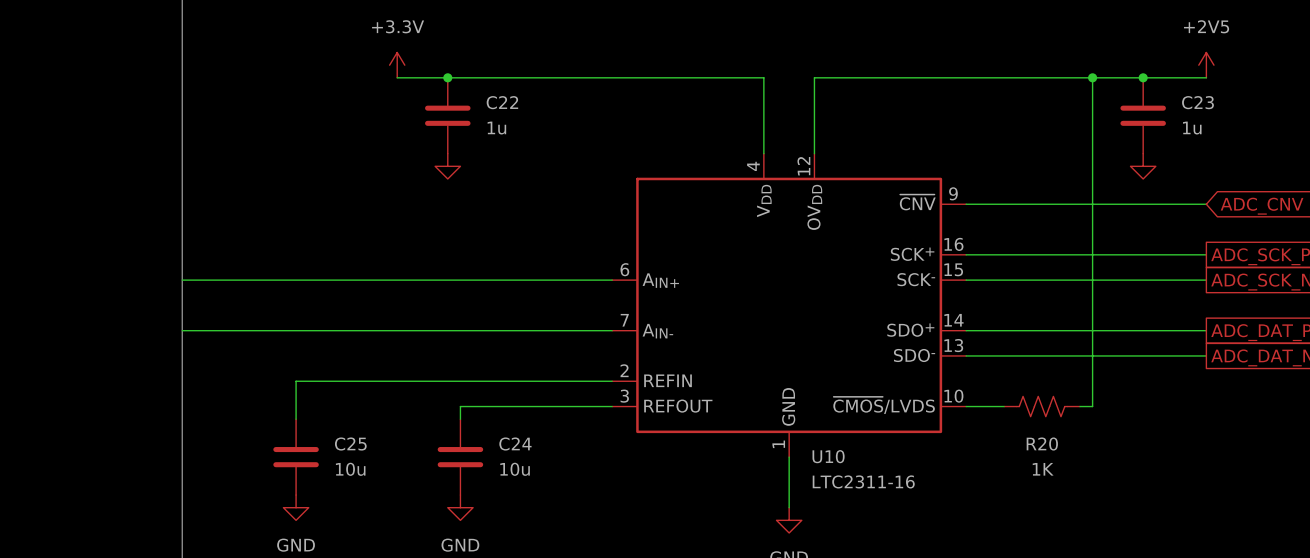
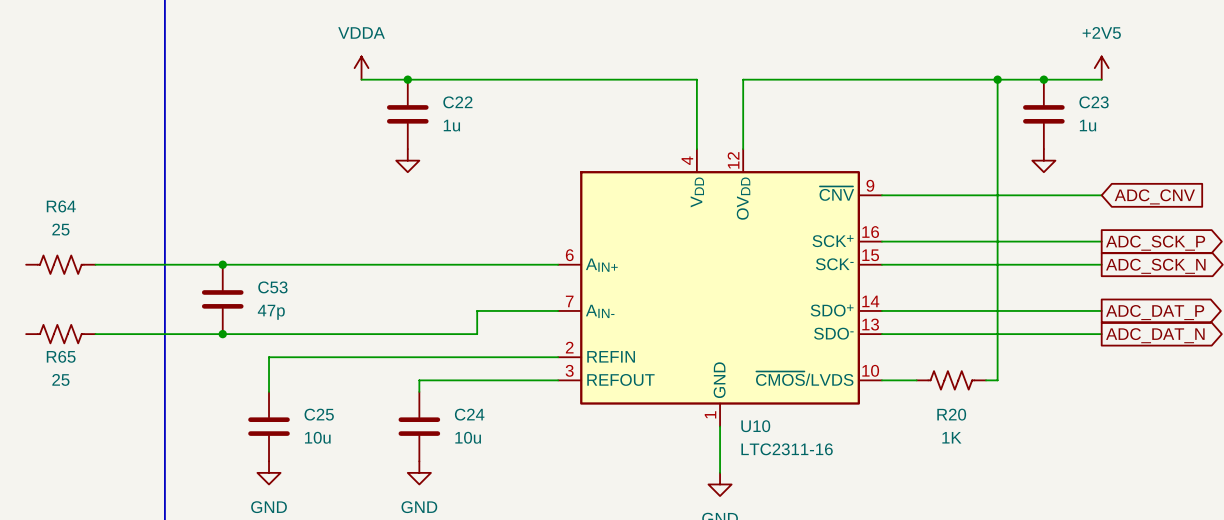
power symbol: +3.3V (397, 65) -> VDDA (361, 68)
R64: none -> 25 (60, 264)
wire: none -> (95, 264) (164, 264)
junction: none -> (222, 264)
C53: none -> 47p (222, 299)
wire: (182, 330) (523, 330) -> (95, 334) (477, 334) (477, 310)
R65: none -> 25 (60, 334)
junction: none -> (222, 334)

